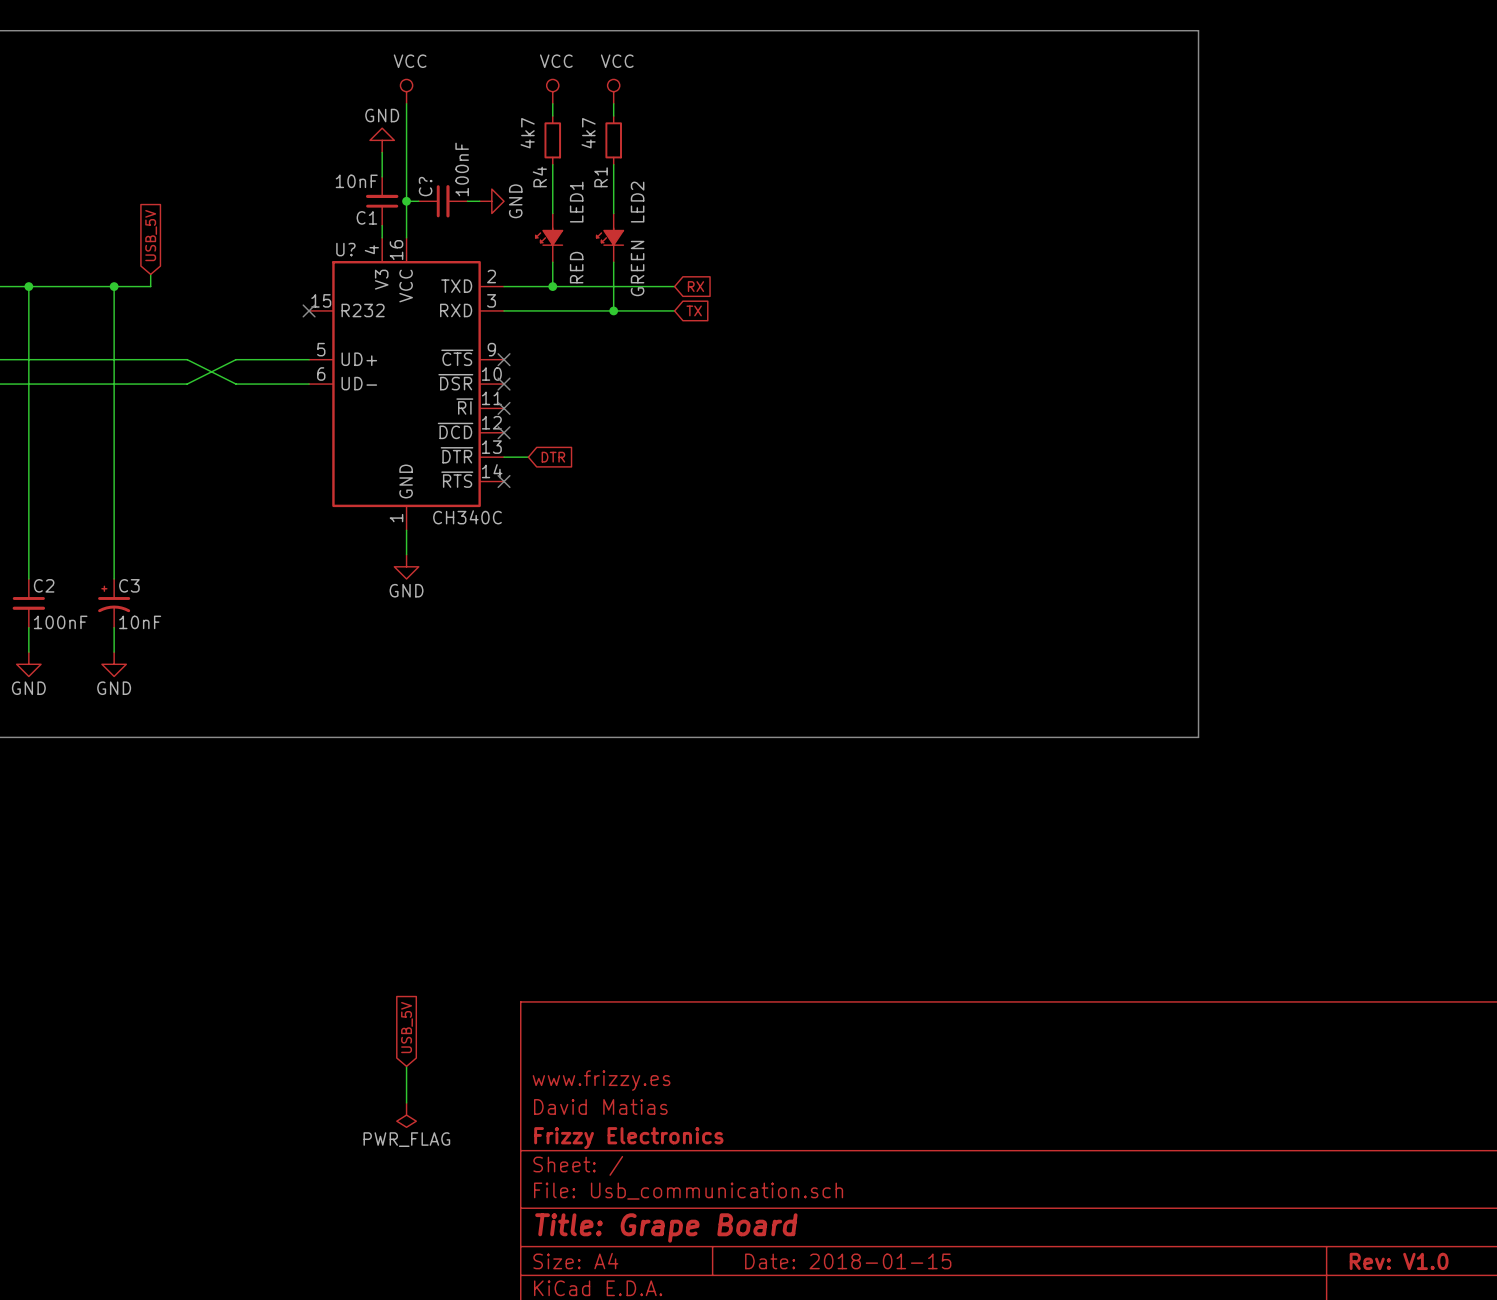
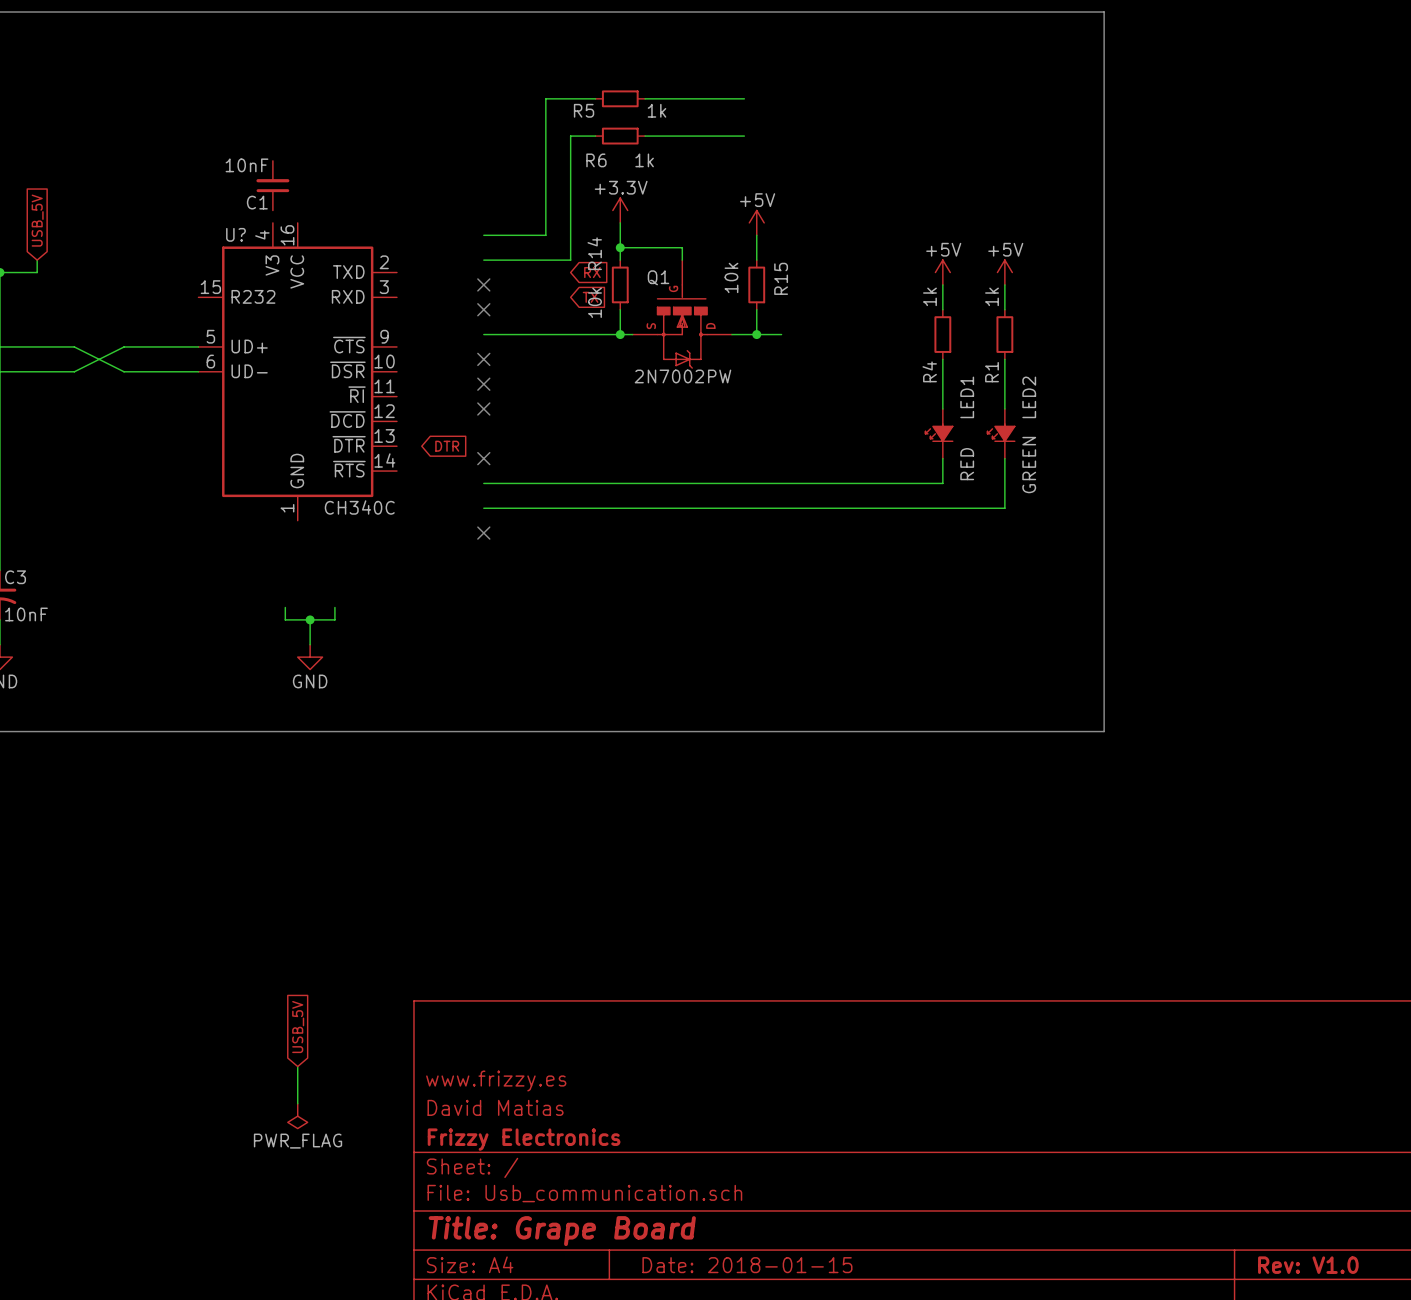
power symbol: VCC (406, 91) -> none
power symbol: VCC (552, 91) -> none
power symbol: VCC (613, 91) -> none
wire: (406, 103) (406, 237) -> none
wire: (552, 103) (552, 116) -> none
wire: (613, 103) (613, 116) -> none
wire: none -> (595, 98) (545, 98) (545, 235) (483, 235)
R5: none -> 1k (620, 98)
wire: none -> (645, 98) (744, 98)
R4 value: 4k7 (527, 133) -> 1k (929, 296)
R1 value: 4k7 (588, 133) -> 1k (992, 296)
power symbol: GND (382, 140) -> none
R4 position: (552, 140) -> (942, 334)
R1 position: (613, 140) -> (1004, 334)
wire: (382, 152) (382, 176) -> none
wire: none -> (595, 136) (570, 136) (570, 260) (483, 260)
R6: none -> 1k (620, 136)
wire: none -> (645, 136) (744, 136)
wire: (552, 164) (552, 213) -> none
wire: (613, 164) (613, 213) -> none
wire: (406, 201) (418, 201) -> none
junction: (406, 201) -> none
C?: 100nF (443, 201) -> none
wire: (467, 201) (479, 201) -> none
power symbol: GND (491, 201) -> none
wire: (382, 225) (382, 237) -> none
power symbol: none -> +3.3V (620, 210)
LED1 position: (549, 237) -> (939, 433)
LED2 position: (610, 237) -> (1001, 433)
wire: none -> (620, 222) (620, 260)
power symbol: none -> +5V (756, 222)
wire: none -> (756, 235) (756, 260)
wire: (552, 262) (552, 286) -> (620, 309) (620, 334)
wire: (613, 262) (613, 310) -> none
wire: none -> (620, 247) (682, 247) (682, 260)
junction: none -> (620, 247)
wire: (504, 286) (674, 286) -> none
junction: (552, 286) -> none
power symbol: none -> +5V (942, 272)
power symbol: none -> +5V (1004, 272)
no-connect mark: none -> (483, 284)
R14: none -> 10k (620, 284)
R15: none -> 10k (756, 284)
wire: none -> (942, 284) (942, 309)
wire: none -> (1004, 284) (1004, 309)
no-connect mark: (309, 310) -> none
wire: (504, 310) (674, 310) -> none
junction: (613, 310) -> none
no-connect mark: none -> (483, 309)
wire: none -> (756, 309) (756, 334)
Q1: none -> 2N7002PW (682, 314)
wire: none -> (483, 334) (632, 334)
junction: none -> (620, 334)
wire: none -> (731, 334) (781, 334)
junction: none -> (756, 334)
no-connect mark: (504, 359) -> none
no-connect mark: none -> (483, 359)
wire: none -> (942, 359) (942, 409)
wire: none -> (1004, 359) (1004, 409)
no-connect mark: (504, 384) -> none
no-connect mark: none -> (483, 384)
no-connect mark: (504, 408) -> none
no-connect mark: none -> (483, 409)
no-connect mark: (504, 432) -> none
wire: (504, 457) (528, 457) -> none
no-connect mark: none -> (483, 458)
wire: none -> (942, 458) (942, 483) (483, 483)
wire: none -> (1004, 458) (1004, 508) (483, 508)
no-connect mark: (504, 481) -> none
wire: (406, 530) (406, 554) -> (310, 619) (310, 644)
no-connect mark: none -> (483, 533)
power symbol position: GND (406, 566) -> GND (310, 657)
wire: none -> (285, 607) (285, 619) (334, 619) (334, 607)
junction: none -> (310, 619)

